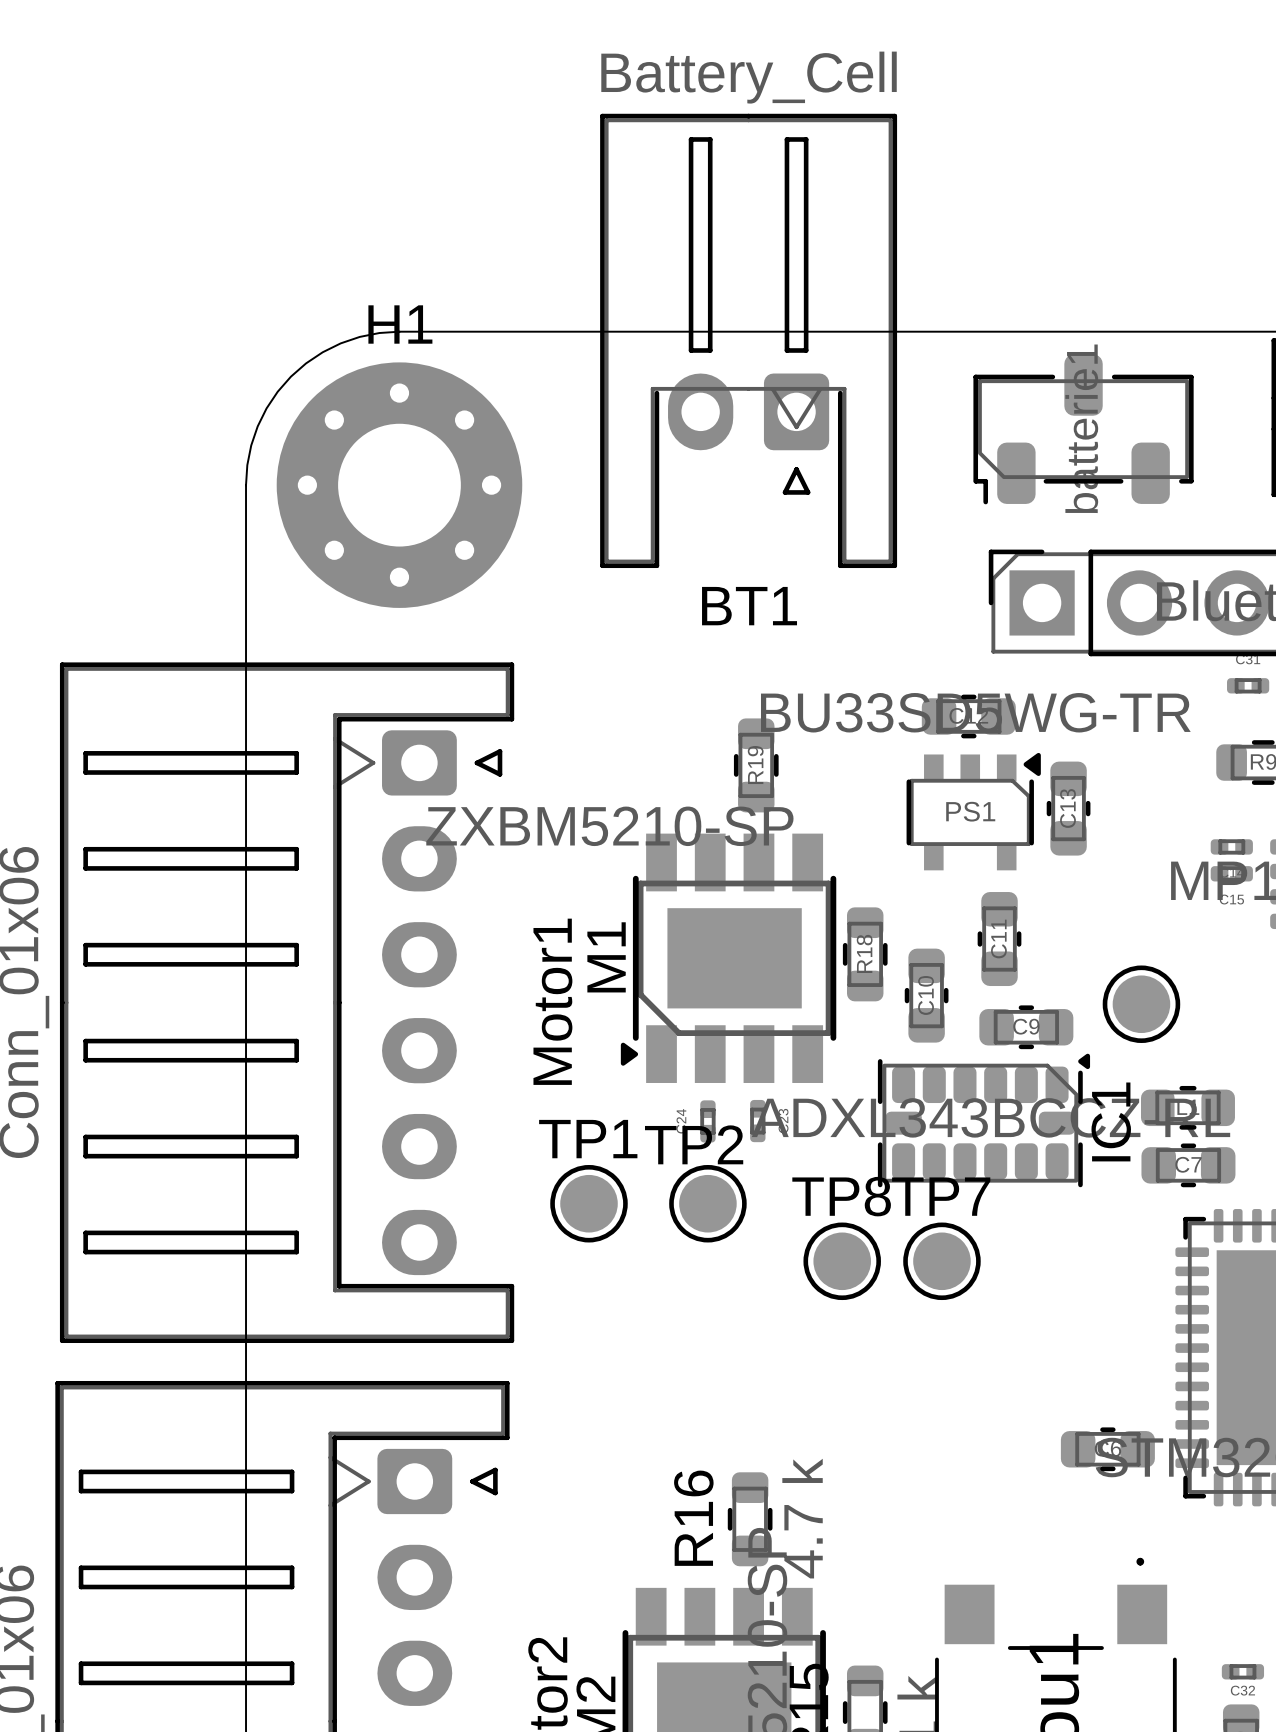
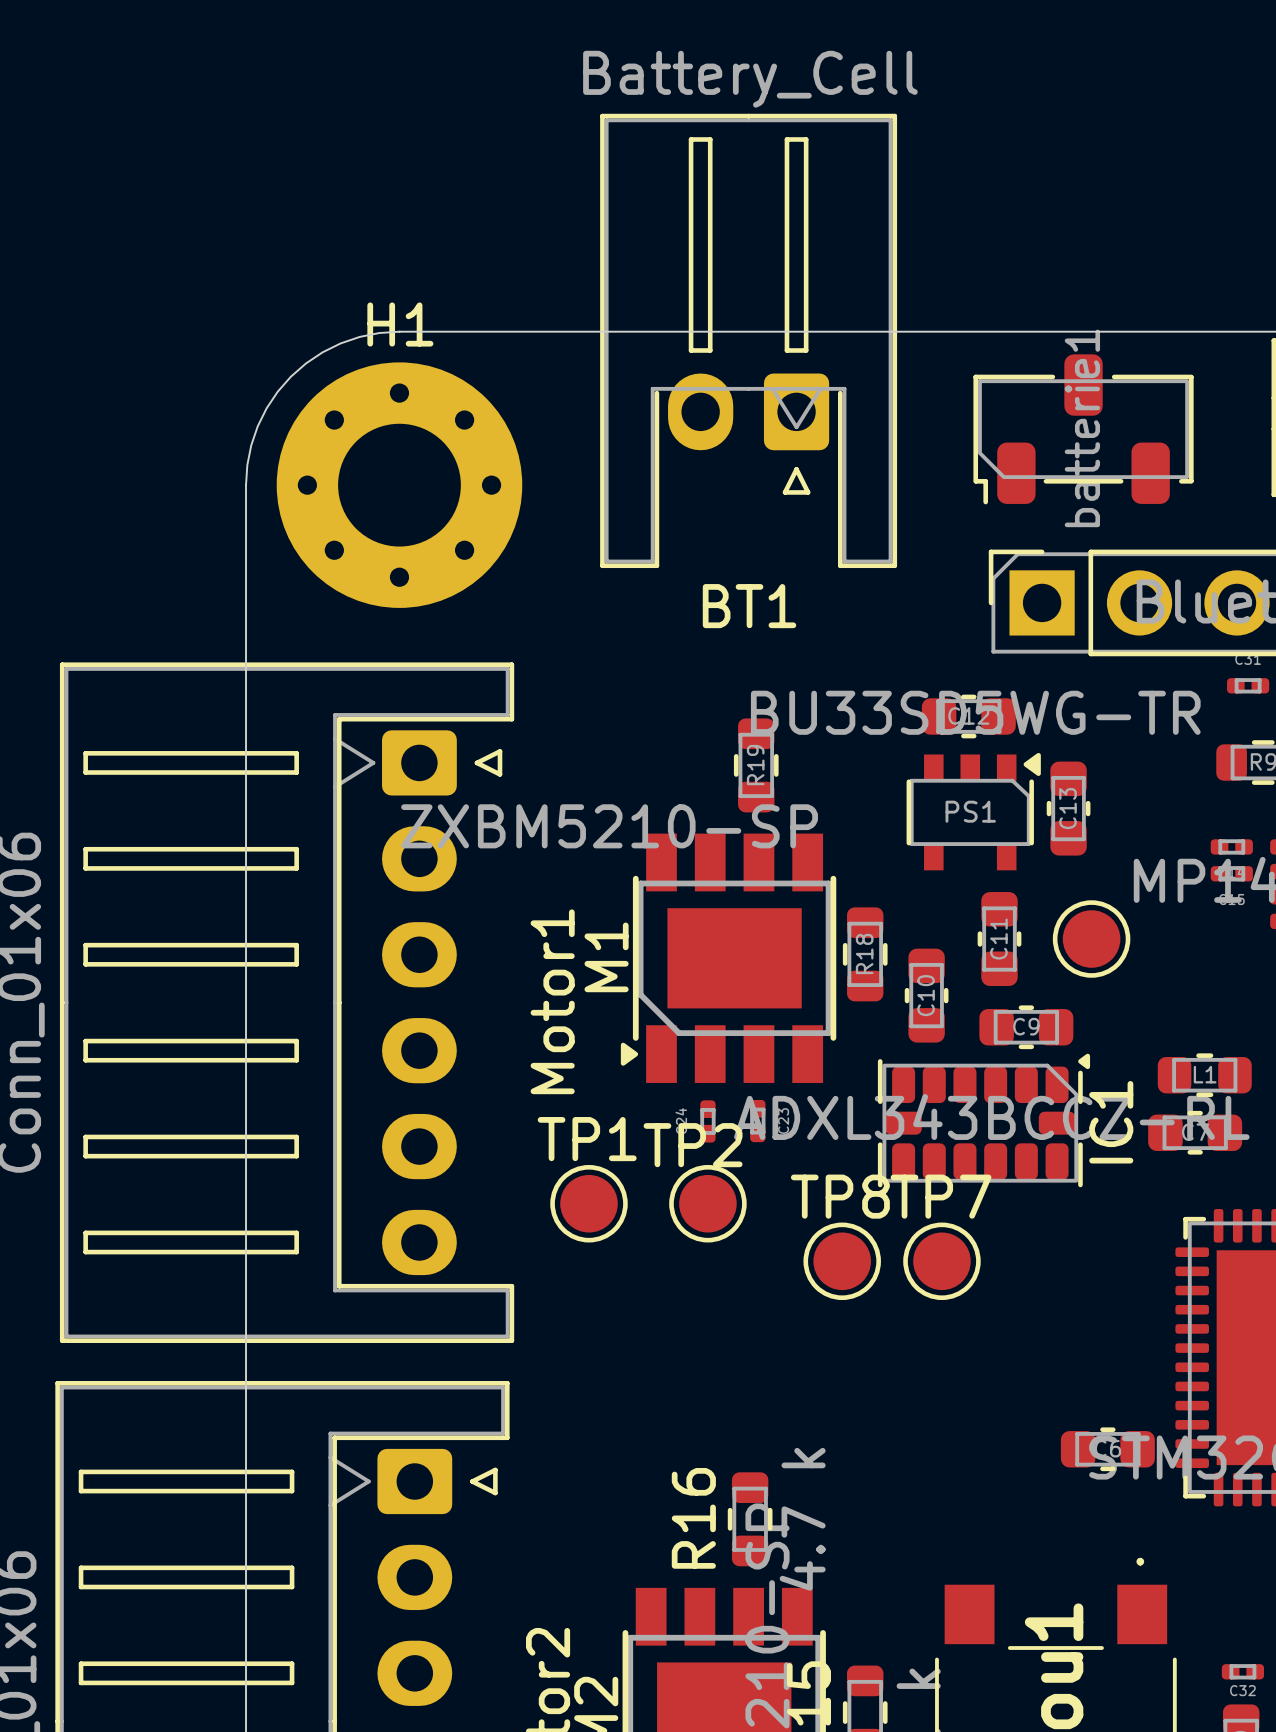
part position: (1141, 1004) -> (1091, 939)
L1 position: (1187, 1107) -> (1204, 1075)
C7 position: (1188, 1165) -> (1195, 1132)

